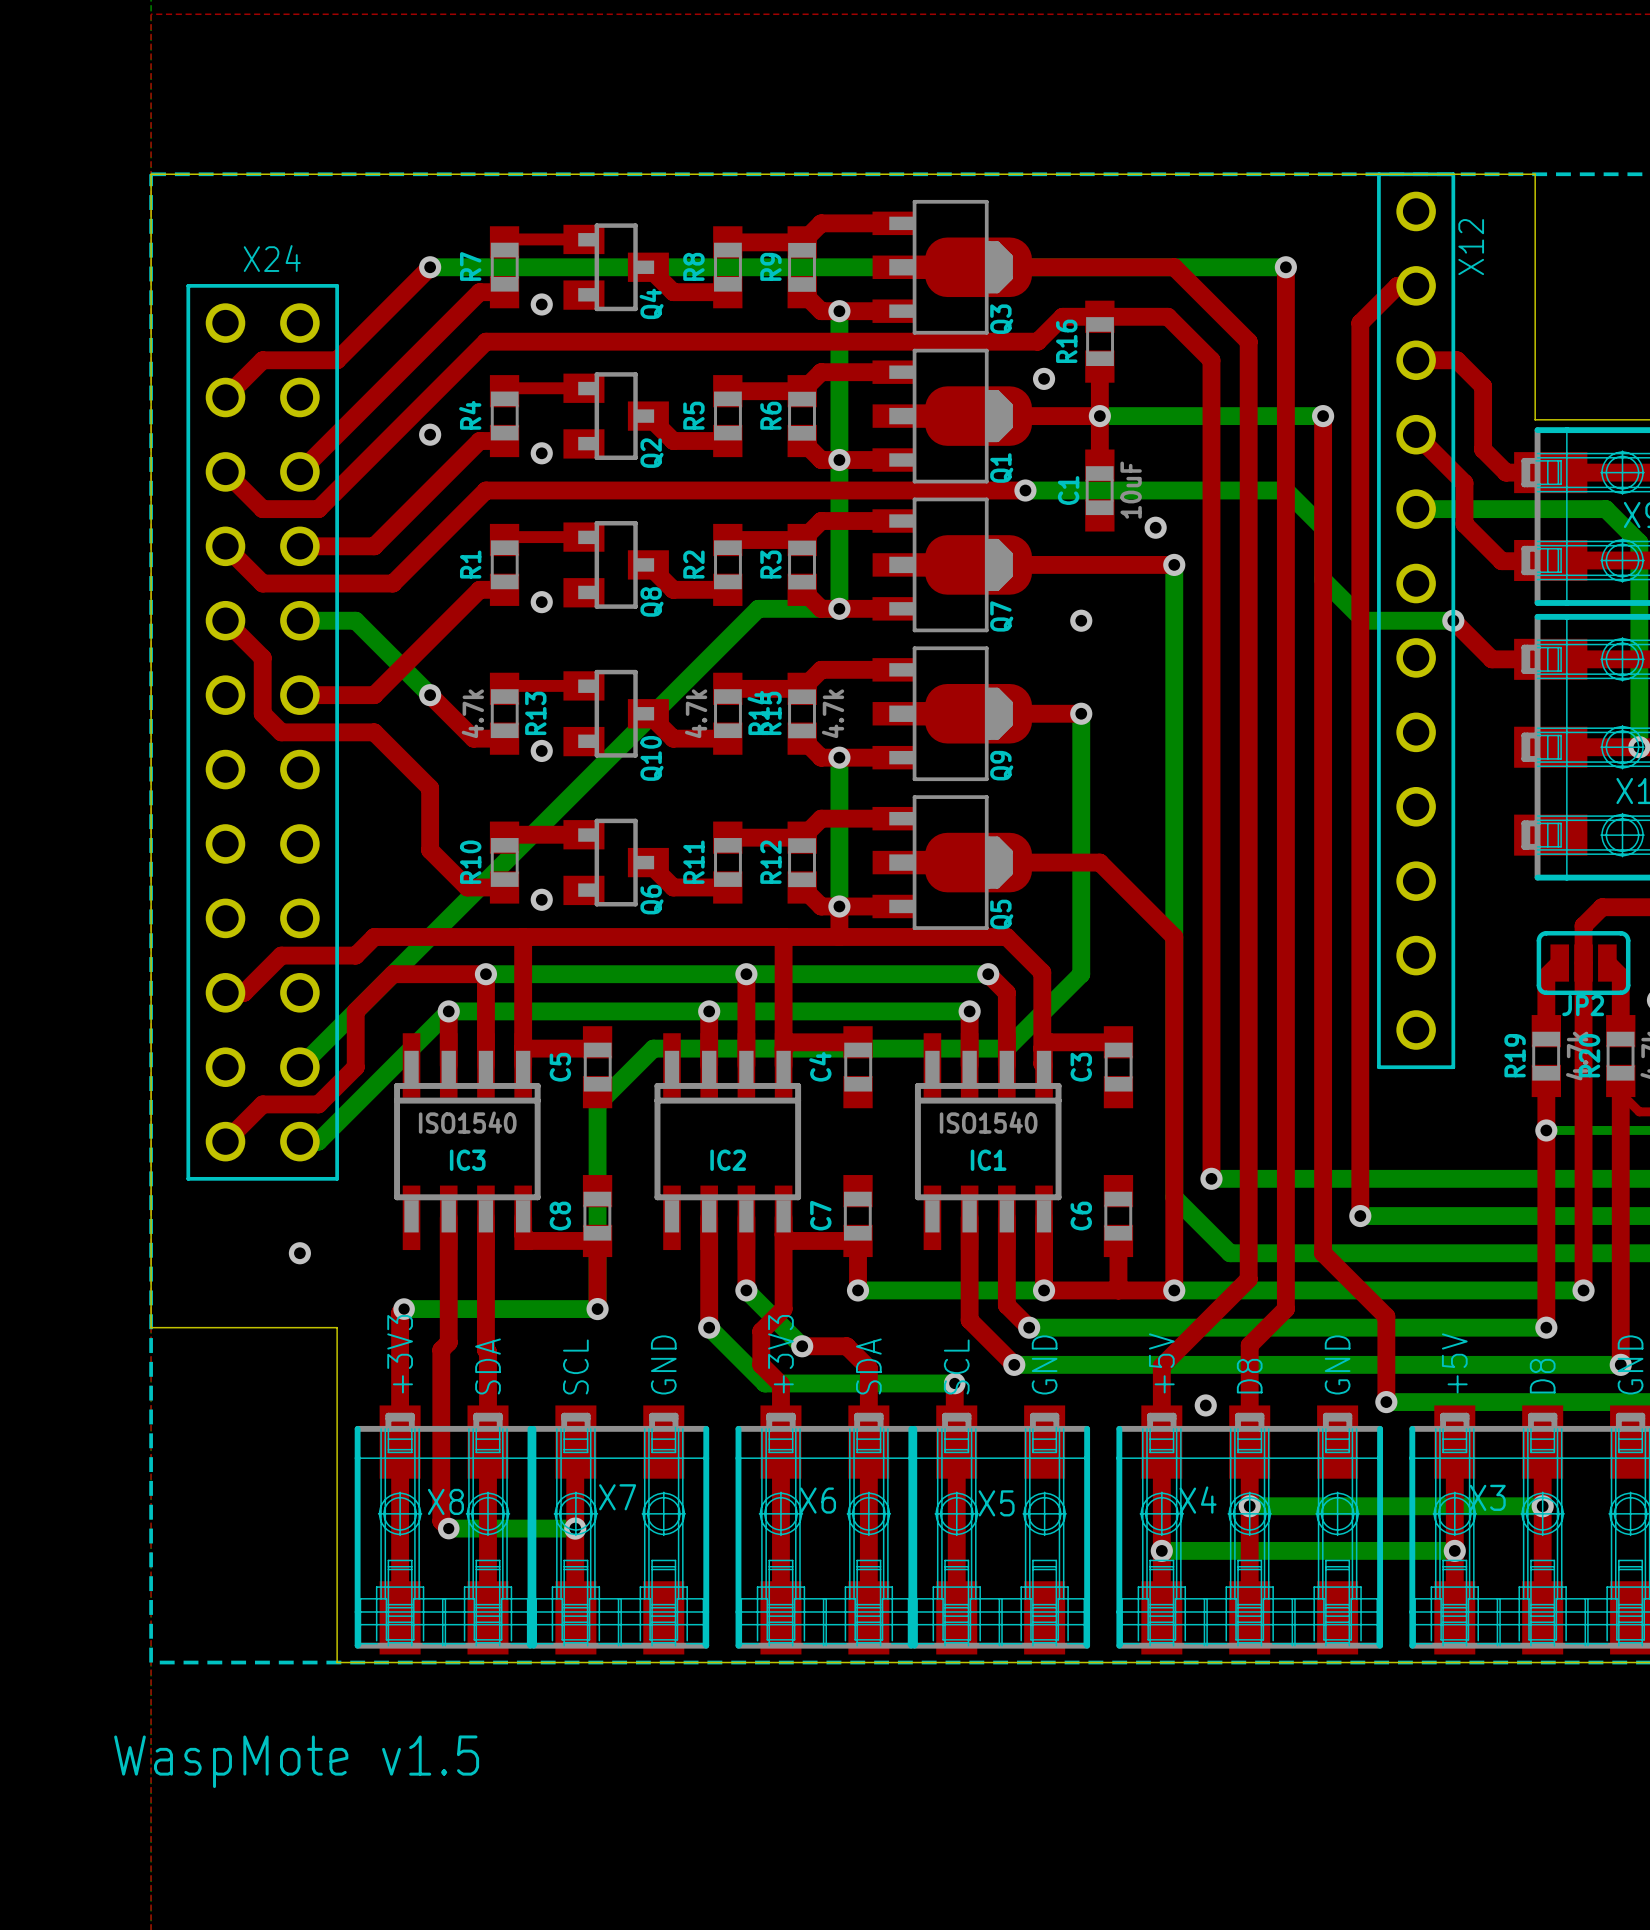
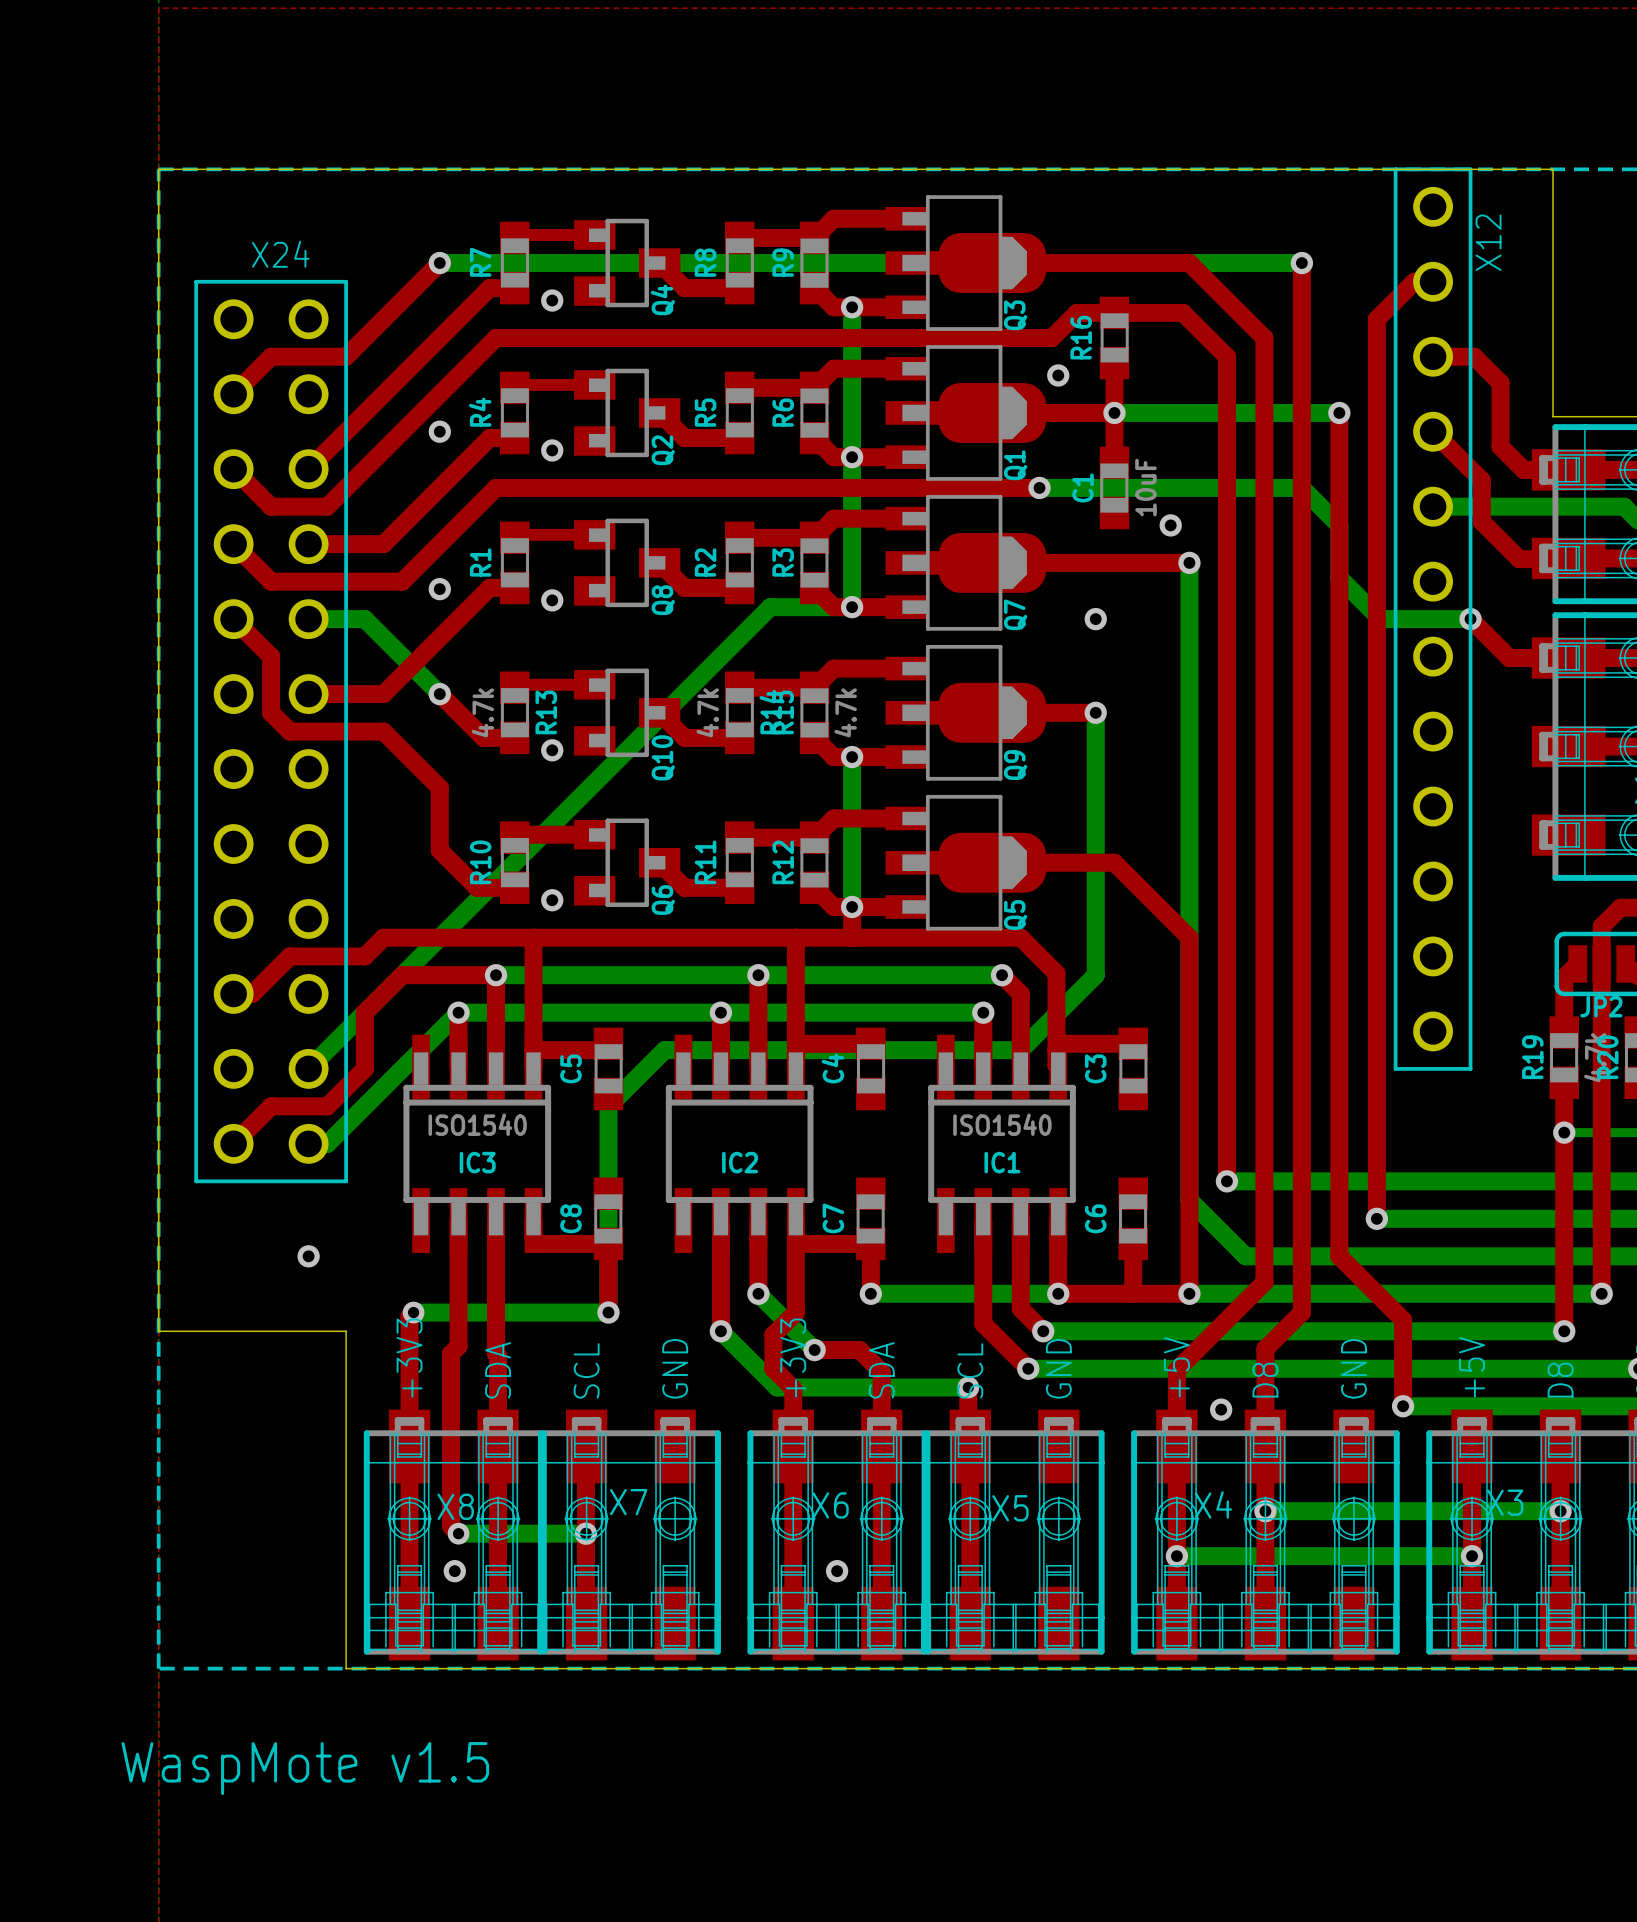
via: none -> (439, 589)
via: none -> (454, 1571)
via: none -> (837, 1571)

